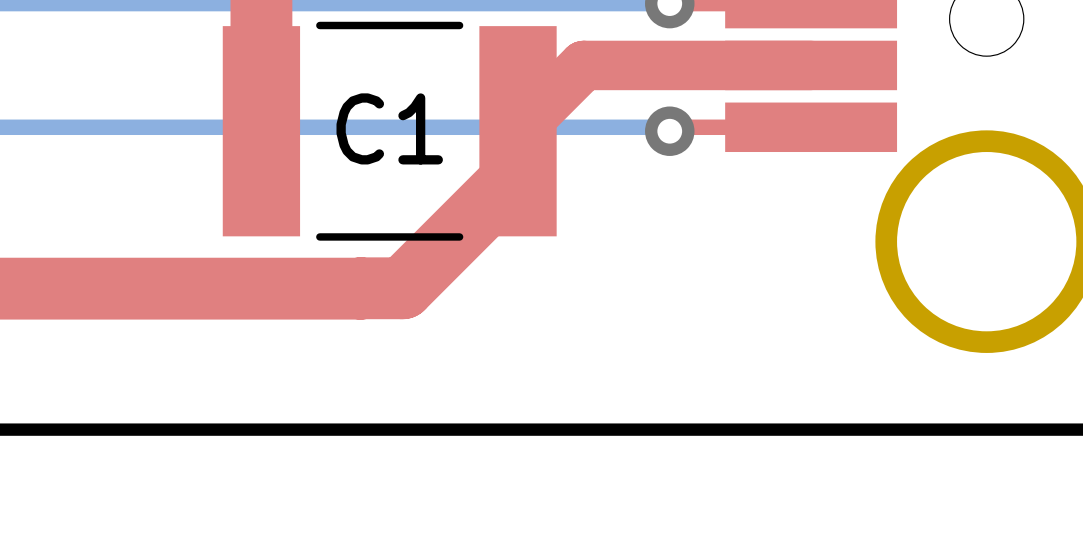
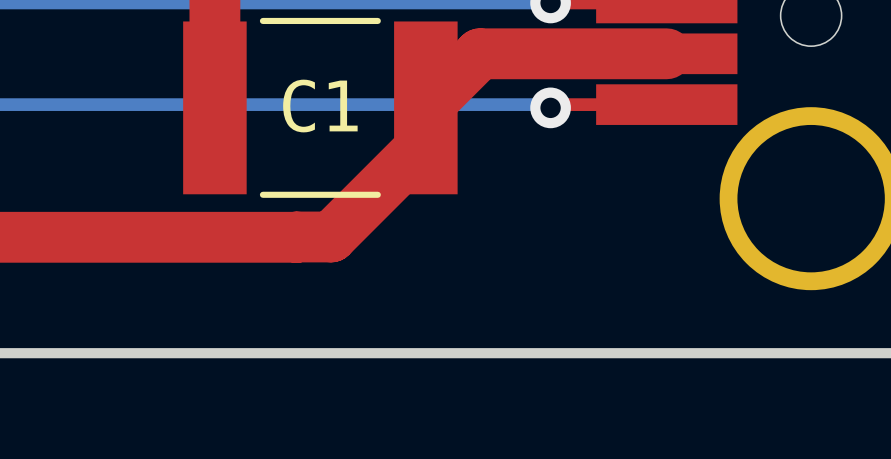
top track width: thin (811, 65) (583, 65) (518, 131) -> thick (666, 53) (479, 53) (425, 107)

